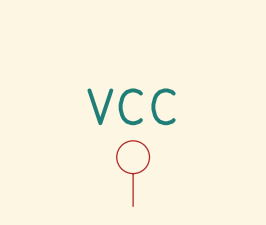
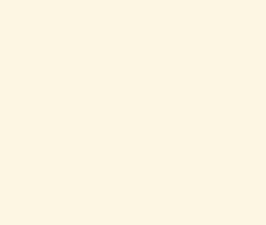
power symbol: VCC (133, 173) -> none

